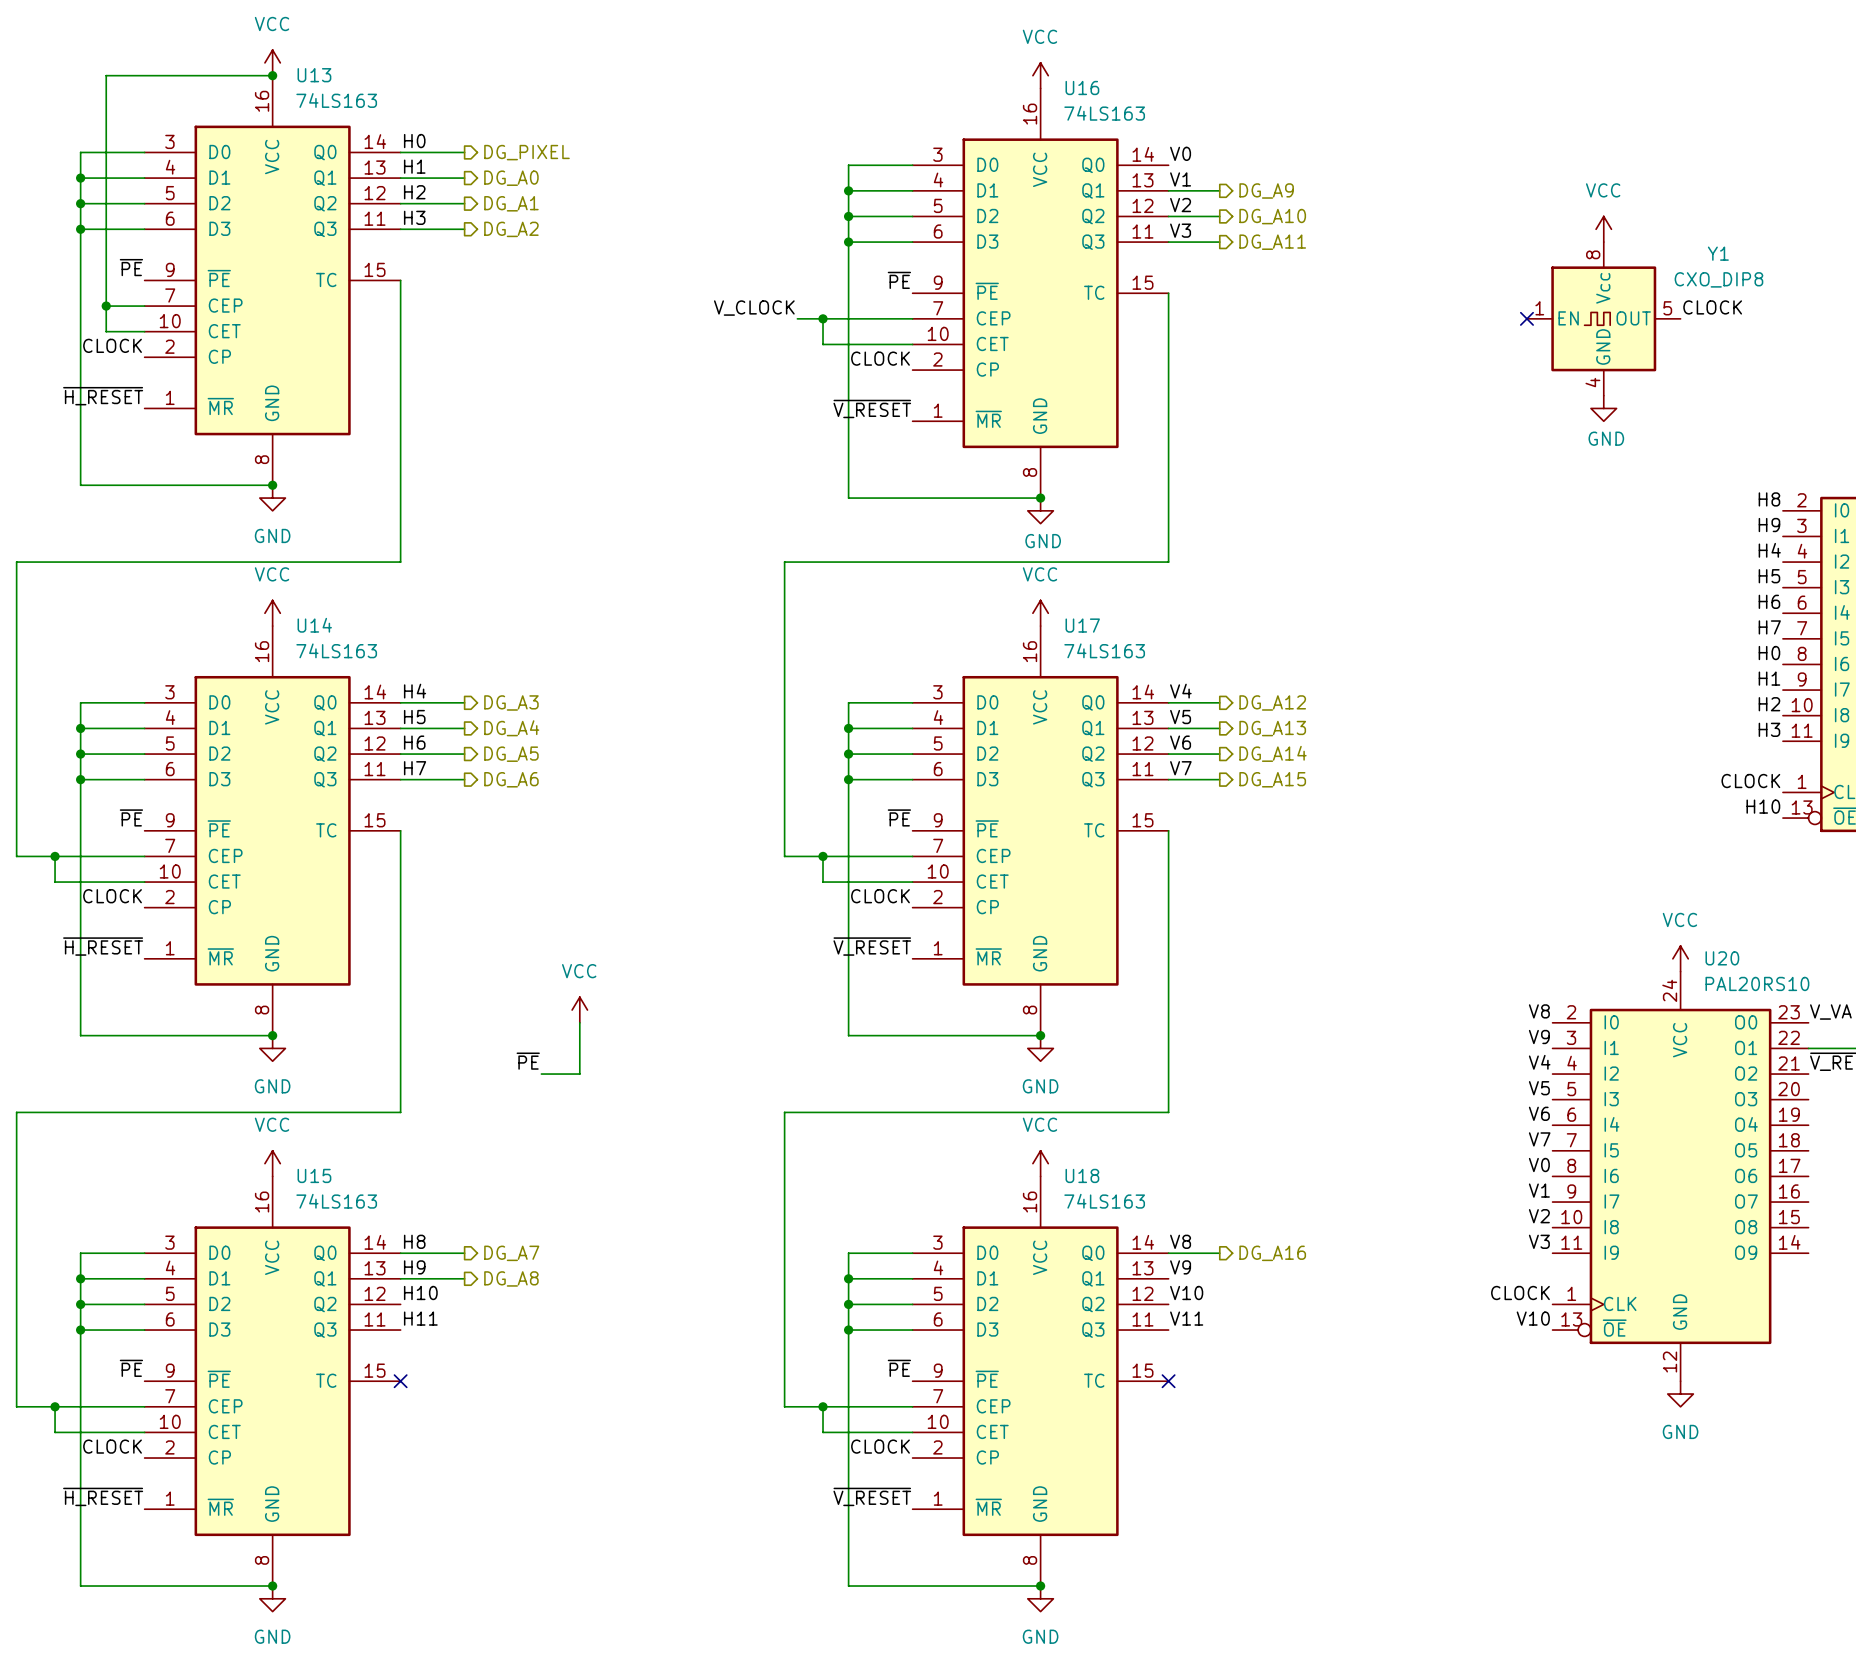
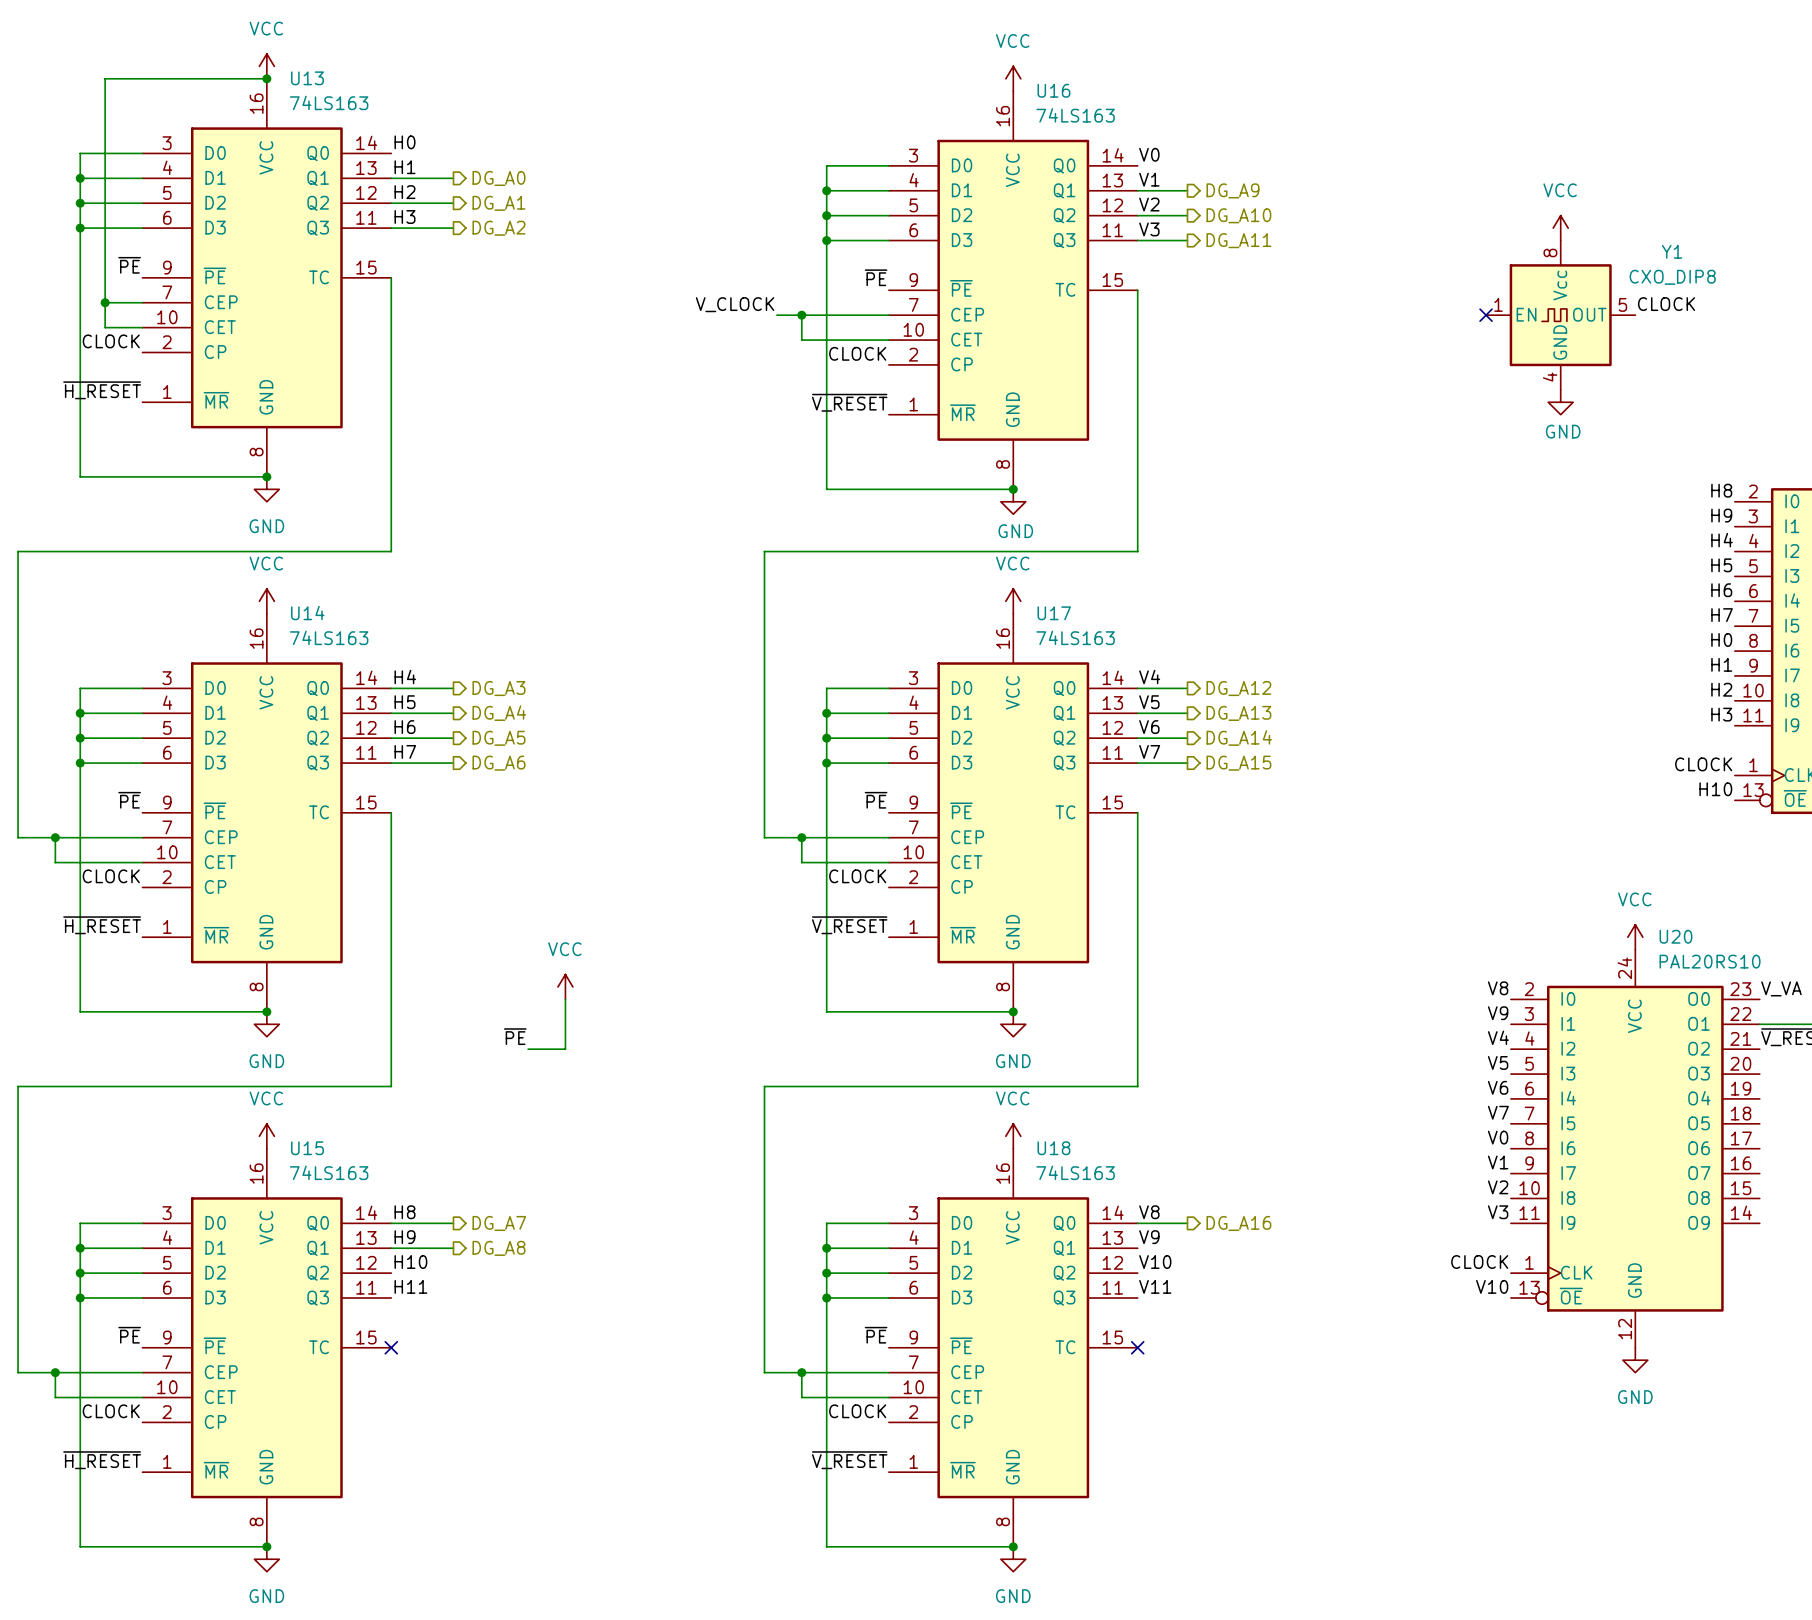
wire: (400, 152) (464, 152) -> none
hierarchical label: DG_PIXEL (526, 152) -> none

